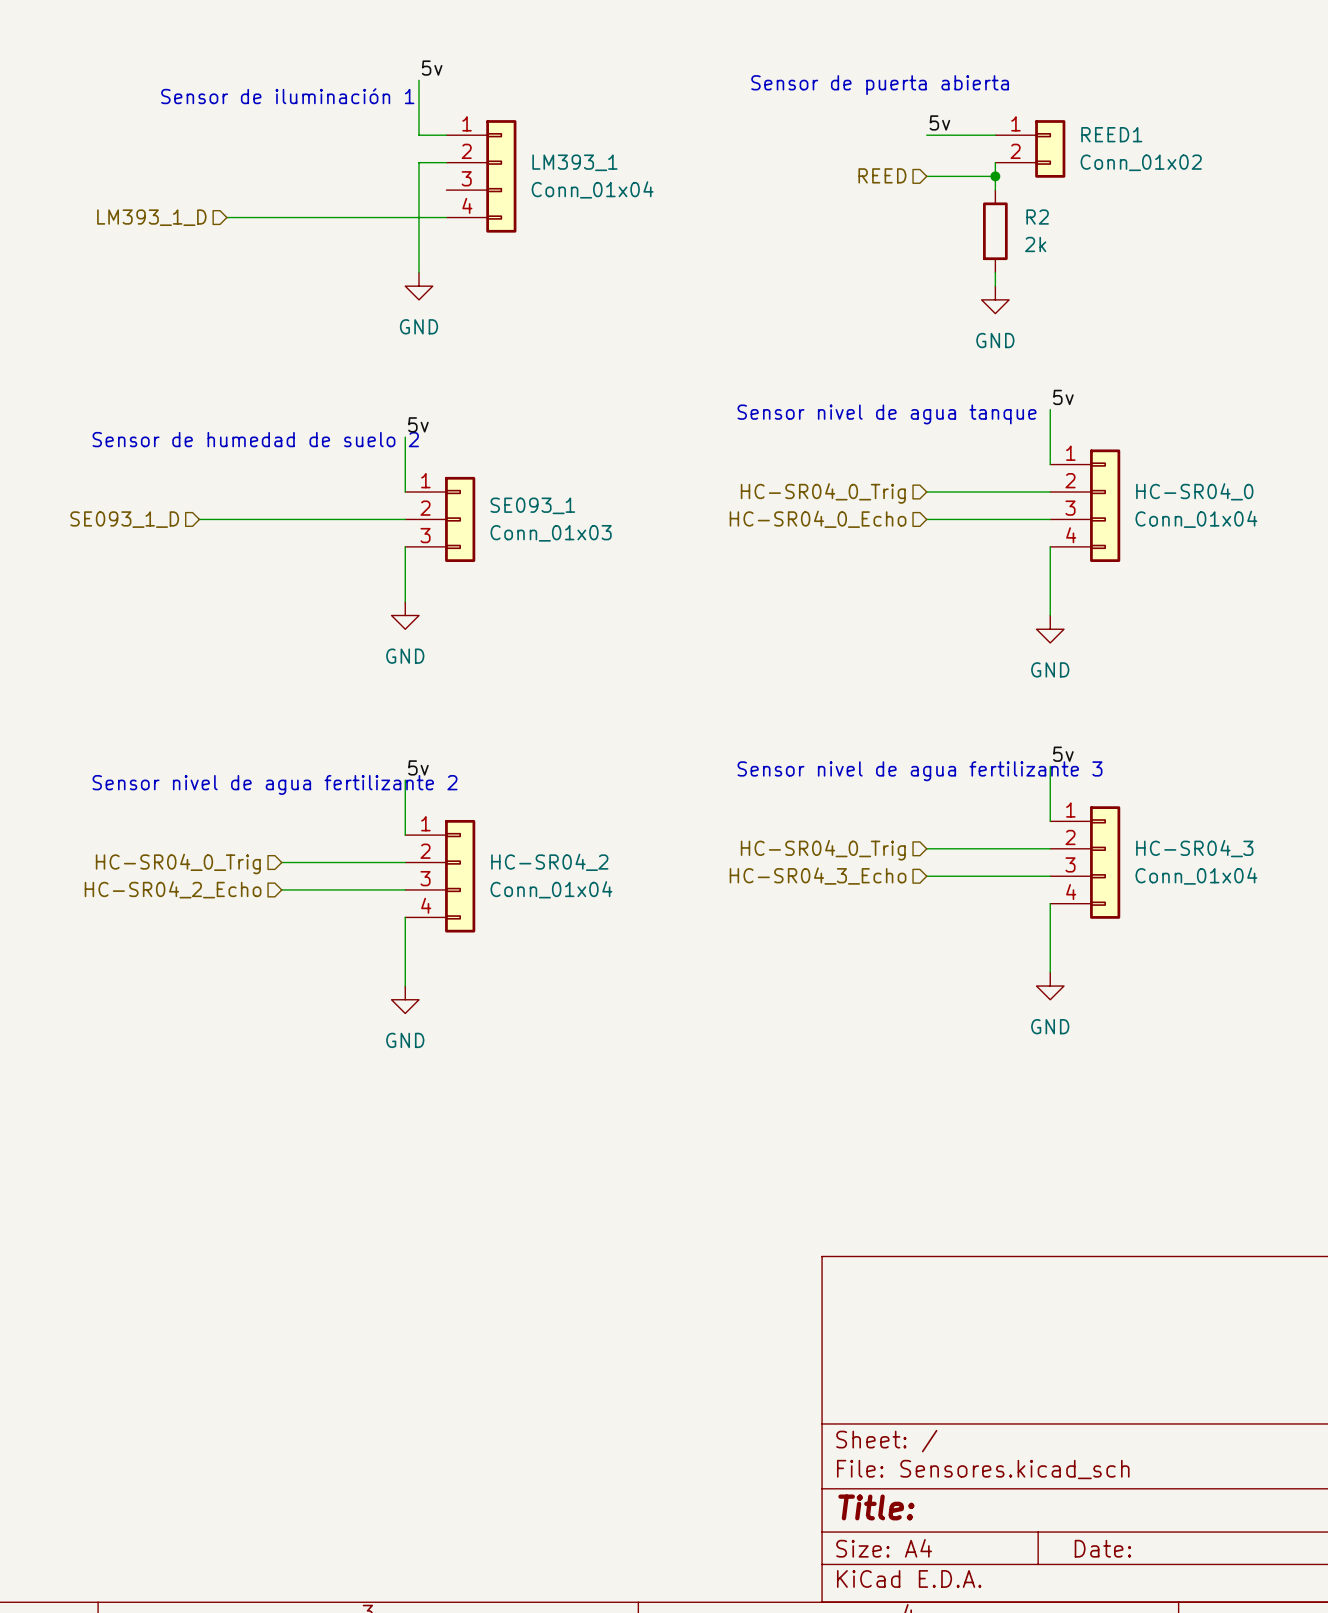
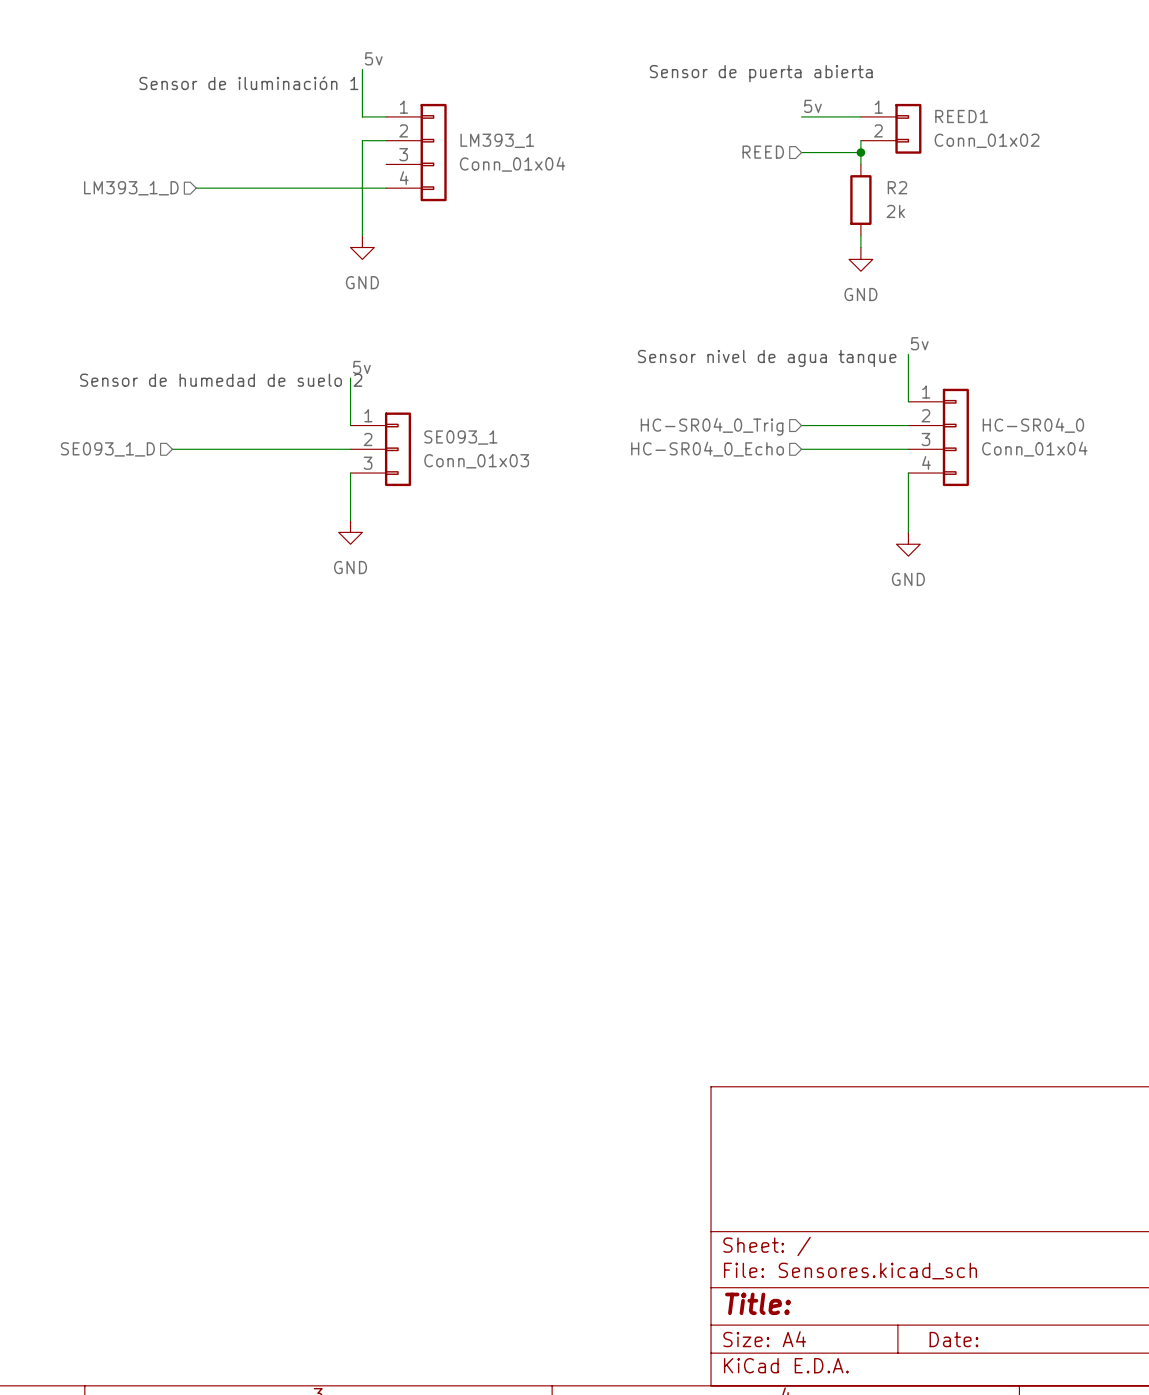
label: 5v (1063, 754) -> none
wire: (1050, 766) (1050, 821) -> none
label: 5v (418, 767) -> none
text: Sensor nivel de agua fertilizante 3 (919, 771) -> none
wire: (405, 780) (405, 835) -> none
text: Sensor nivel de agua fertilizante 2 (275, 784) -> none
wire: (926, 848) (1050, 848) -> none
hierarchical label: HC-SR04_0_Trig (823, 850) -> none
wire: (281, 862) (405, 862) -> none
HC-SR04_3: Conn_01x04 (1085, 862) -> none
hierarchical label: HC-SR04_0_Trig (178, 863) -> none
HC-SR04_2: Conn_01x04 (440, 876) -> none
hierarchical label: HC-SR04_3_Echo (818, 876) -> none
wire: (926, 876) (1050, 876) -> none
hierarchical label: HC-SR04_2_Echo (173, 889) -> none
wire: (281, 889) (405, 889) -> none
wire: (1050, 903) (1050, 972) -> none
wire: (405, 917) (405, 986) -> none
power symbol: GND (1050, 986) -> none
power symbol: GND (405, 999) -> none

